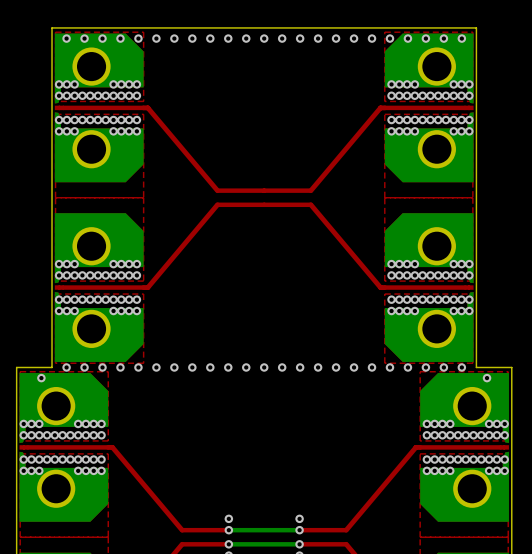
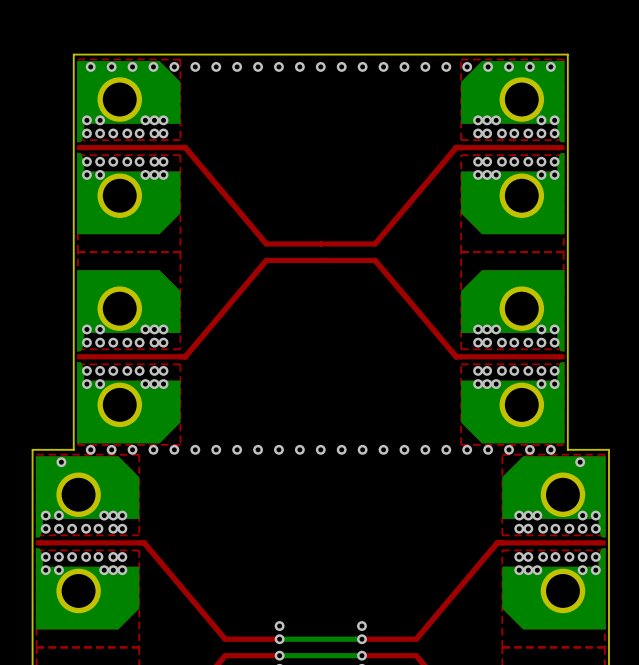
via: (59, 84) -> none
via: none -> (86, 120)
via: (66, 84) -> none
via: (136, 84) -> none
via: (391, 84) -> none
via: (461, 84) -> none
via: none -> (554, 120)
via: (469, 84) -> none
via: (59, 95) -> none
via: none -> (86, 133)
via: (66, 95) -> none
via: (82, 95) -> none
via: none -> (113, 133)
via: (90, 95) -> none
via: (105, 95) -> none
via: none -> (139, 133)
via: (113, 95) -> none
via: (136, 95) -> none
via: (391, 95) -> none
via: (414, 95) -> none
via: none -> (501, 133)
via: (422, 95) -> none
via: (438, 95) -> none
via: none -> (528, 133)
via: (445, 95) -> none
via: (461, 95) -> none
via: none -> (554, 133)
via: (469, 95) -> none
via: (59, 120) -> none
via: none -> (86, 161)
via: (66, 120) -> none
via: (82, 120) -> none
via: none -> (113, 161)
via: (90, 120) -> none
via: (105, 120) -> none
via: none -> (139, 161)
via: (113, 120) -> none
via: (136, 120) -> none
via: (391, 120) -> none
via: (414, 120) -> none
via: none -> (501, 161)
via: (422, 120) -> none
via: (438, 120) -> none
via: none -> (528, 161)
via: (445, 120) -> none
via: (461, 120) -> none
via: none -> (554, 161)
via: (469, 120) -> none
via: (59, 131) -> none
via: none -> (86, 174)
via: (66, 131) -> none
via: (136, 131) -> none
via: (391, 131) -> none
via: (461, 131) -> none
via: none -> (554, 174)
via: (469, 131) -> none
via: (59, 264) -> none
via: none -> (86, 329)
via: (66, 264) -> none
via: (136, 264) -> none
via: (391, 264) -> none
via: (461, 264) -> none
via: none -> (554, 329)
via: (469, 264) -> none
via: (59, 275) -> none
via: none -> (86, 342)
via: (66, 275) -> none
via: (82, 275) -> none
via: none -> (113, 342)
via: (90, 275) -> none
via: (105, 275) -> none
via: none -> (139, 342)
via: (113, 275) -> none
via: (136, 275) -> none
via: (391, 275) -> none
via: (414, 275) -> none
via: none -> (501, 342)
via: (422, 275) -> none
via: (438, 275) -> none
via: none -> (528, 342)
via: (445, 275) -> none
via: (461, 275) -> none
via: none -> (554, 342)
via: (469, 275) -> none
via: (59, 299) -> none
via: none -> (86, 370)
via: (66, 299) -> none
via: (82, 299) -> none
via: none -> (113, 370)
via: (90, 299) -> none
via: (105, 299) -> none
via: none -> (139, 370)
via: (113, 299) -> none
via: (136, 299) -> none
via: (391, 299) -> none
via: (414, 299) -> none
via: none -> (501, 370)
via: (422, 299) -> none
via: (438, 299) -> none
via: none -> (528, 370)
via: (445, 299) -> none
via: (461, 299) -> none
via: none -> (554, 370)
via: (469, 299) -> none
via: (59, 311) -> none
via: none -> (86, 384)
via: (66, 311) -> none
via: (136, 311) -> none
via: (391, 311) -> none
via: (461, 311) -> none
via: none -> (554, 384)
via: (469, 311) -> none
via: (23, 423) -> none
via: none -> (45, 515)
via: (31, 423) -> none
via: (101, 423) -> none
via: (426, 423) -> none
via: (496, 423) -> none
via: none -> (595, 515)
via: (504, 423) -> none
via: (23, 435) -> none
via: none -> (45, 528)
via: (31, 435) -> none
via: (47, 435) -> none
via: none -> (72, 528)
via: (54, 435) -> none
via: (70, 435) -> none
via: none -> (98, 528)
via: (78, 435) -> none
via: (101, 435) -> none
via: (426, 435) -> none
via: (450, 435) -> none
via: none -> (543, 528)
via: (458, 435) -> none
via: (473, 435) -> none
via: none -> (569, 528)
via: (481, 435) -> none
via: (496, 435) -> none
via: none -> (595, 528)
via: (504, 435) -> none
via: (23, 459) -> none
via: none -> (45, 556)
via: (31, 459) -> none
via: (47, 459) -> none
via: none -> (72, 556)
via: (54, 459) -> none
via: (70, 459) -> none
via: none -> (98, 556)
via: (78, 459) -> none
via: (101, 459) -> none
via: (426, 459) -> none
via: (450, 459) -> none
via: none -> (543, 556)
via: (458, 459) -> none
via: (473, 459) -> none
via: none -> (569, 556)
via: (481, 459) -> none
via: (496, 459) -> none
via: none -> (595, 556)
via: (504, 459) -> none
via: (23, 470) -> none
via: none -> (45, 570)
via: (31, 470) -> none
via: (101, 470) -> none
via: (426, 470) -> none
via: (496, 470) -> none
via: none -> (595, 570)
via: (504, 470) -> none

